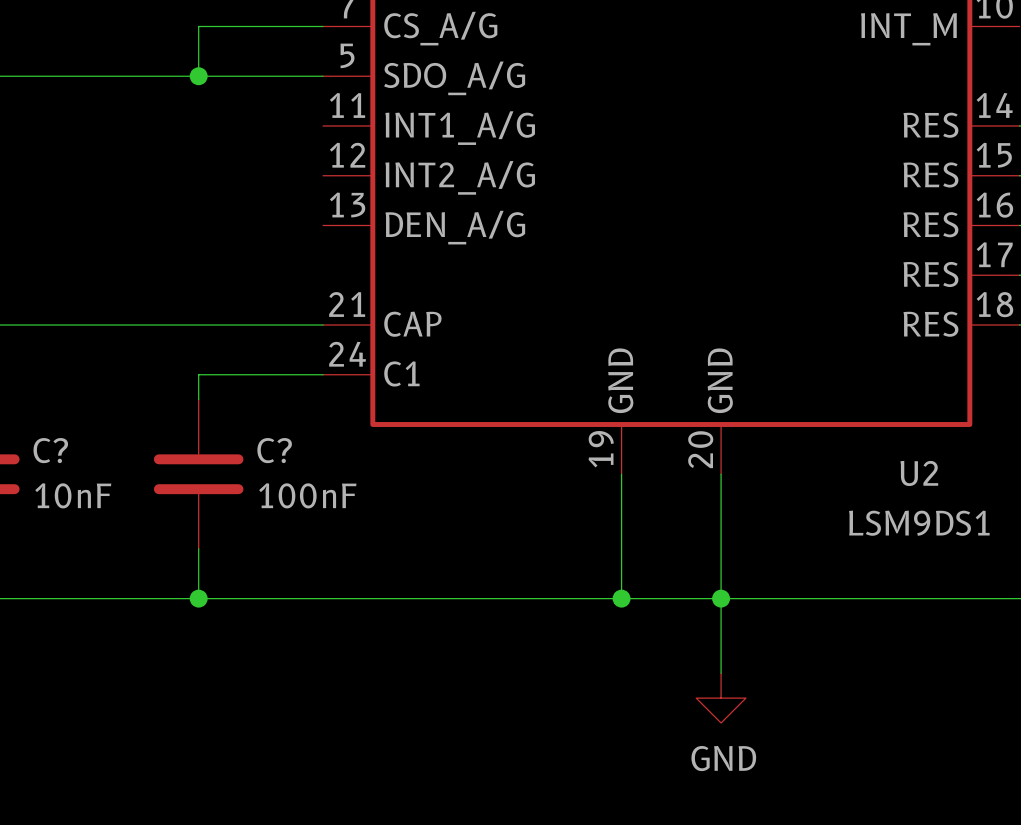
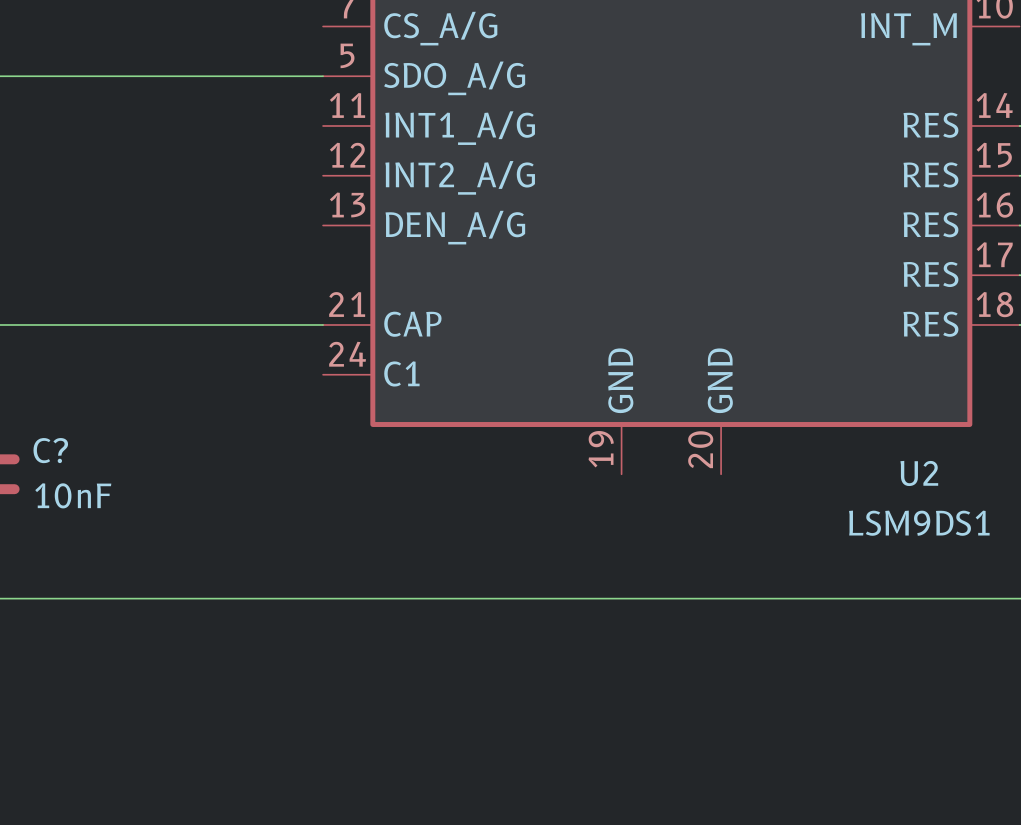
wire: (323, 26) (198, 26) (198, 76) -> none
junction: (198, 76) -> none
wire: (323, 374) (198, 374) (198, 399) -> none
C?: 100nF (198, 474) -> none
wire: (621, 474) (621, 598) -> none
wire: (721, 474) (721, 673) -> none
wire: (198, 548) (198, 598) -> none
junction: (198, 598) -> none
junction: (621, 598) -> none
junction: (721, 598) -> none
power symbol: GND (721, 698) -> none

